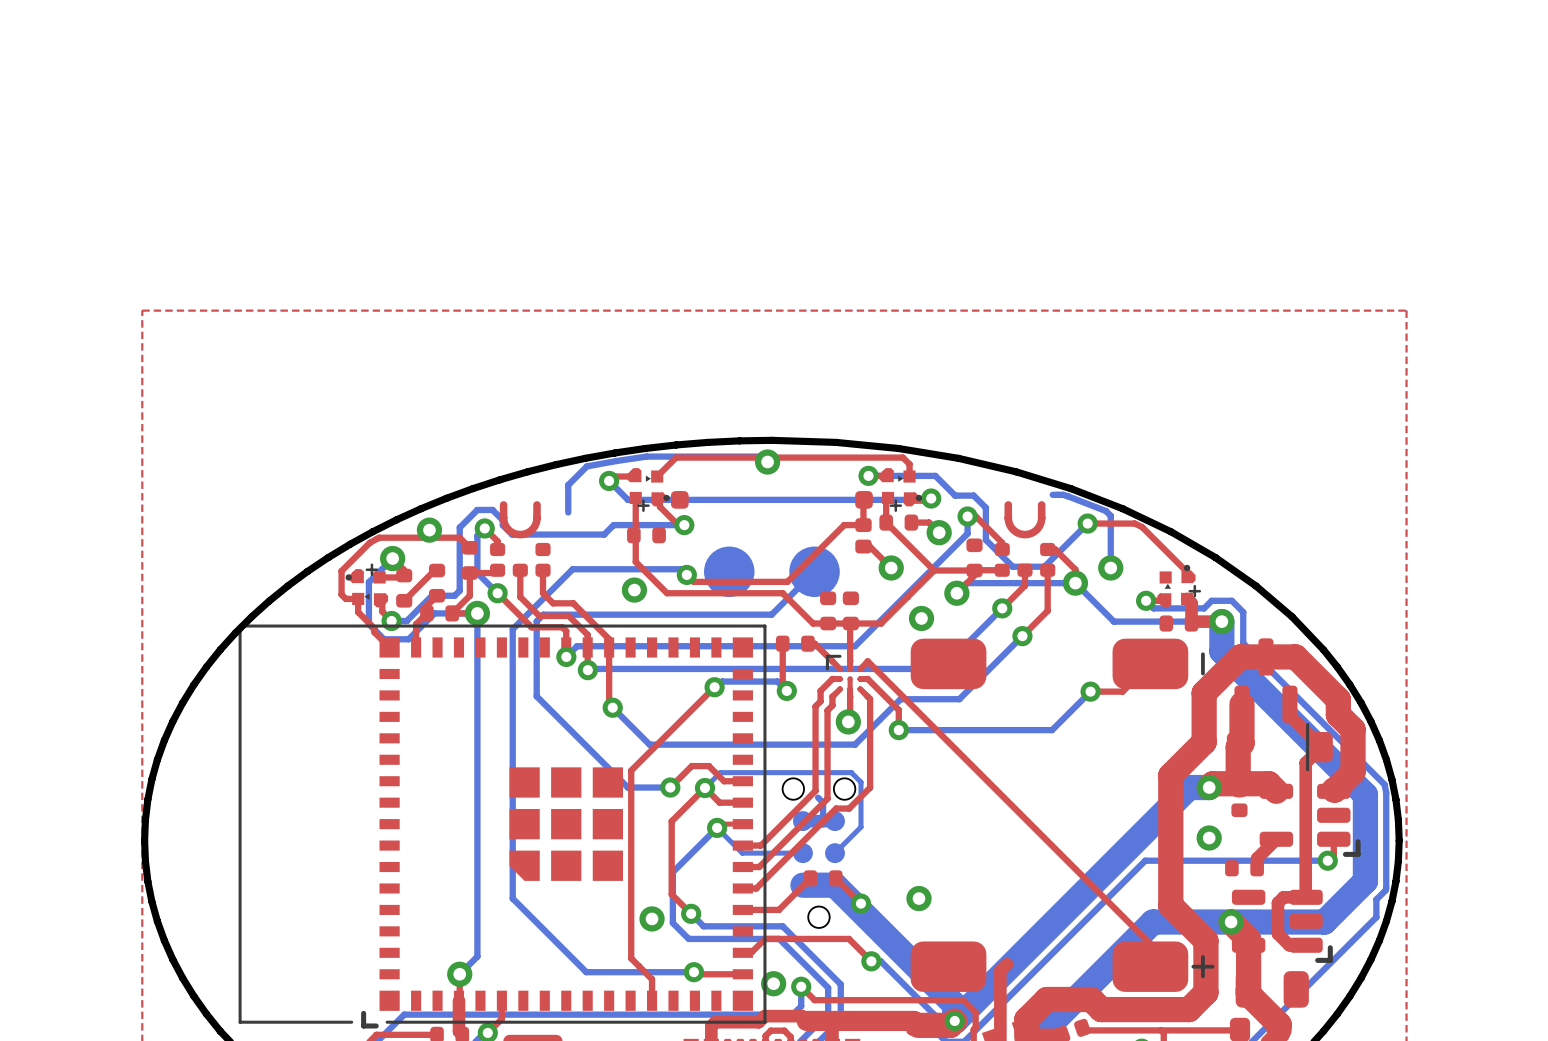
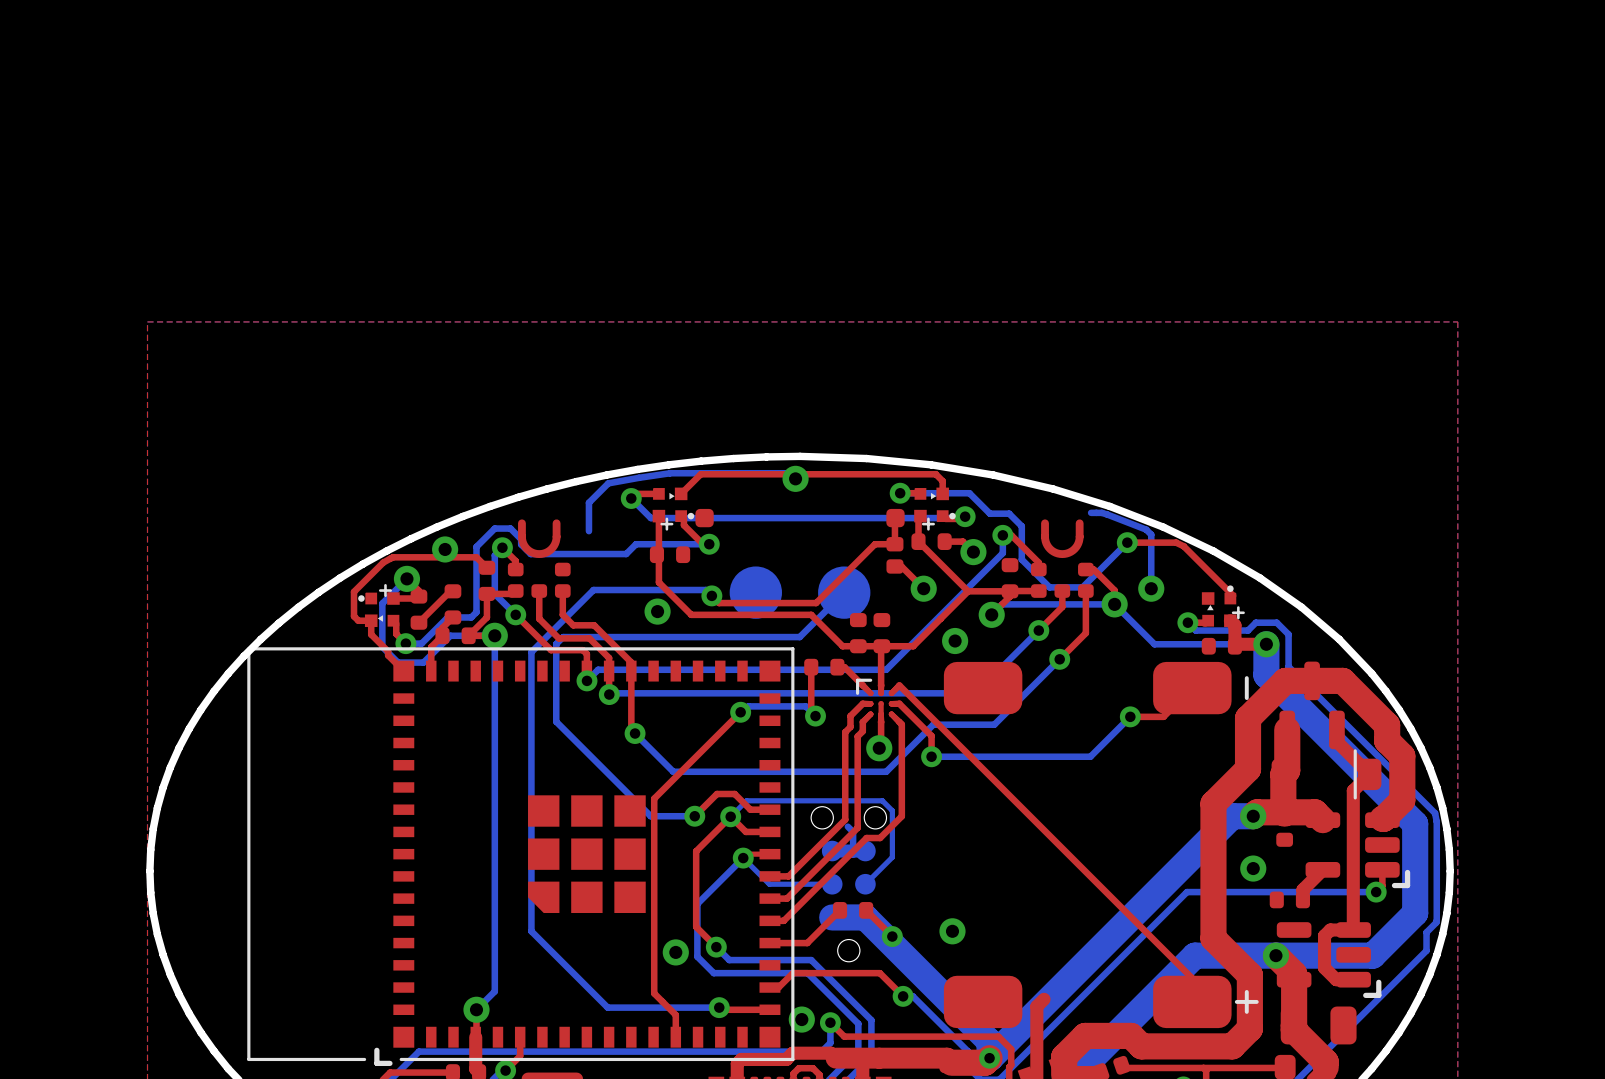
part footprint: [627, 468, 670, 512] -> [652, 487, 695, 531]
part footprint: [879, 468, 923, 512] -> [914, 487, 956, 531]
part footprint: [345, 563, 389, 608] -> [358, 583, 400, 628]
part footprint: [1157, 564, 1202, 608] -> [1201, 585, 1245, 628]

